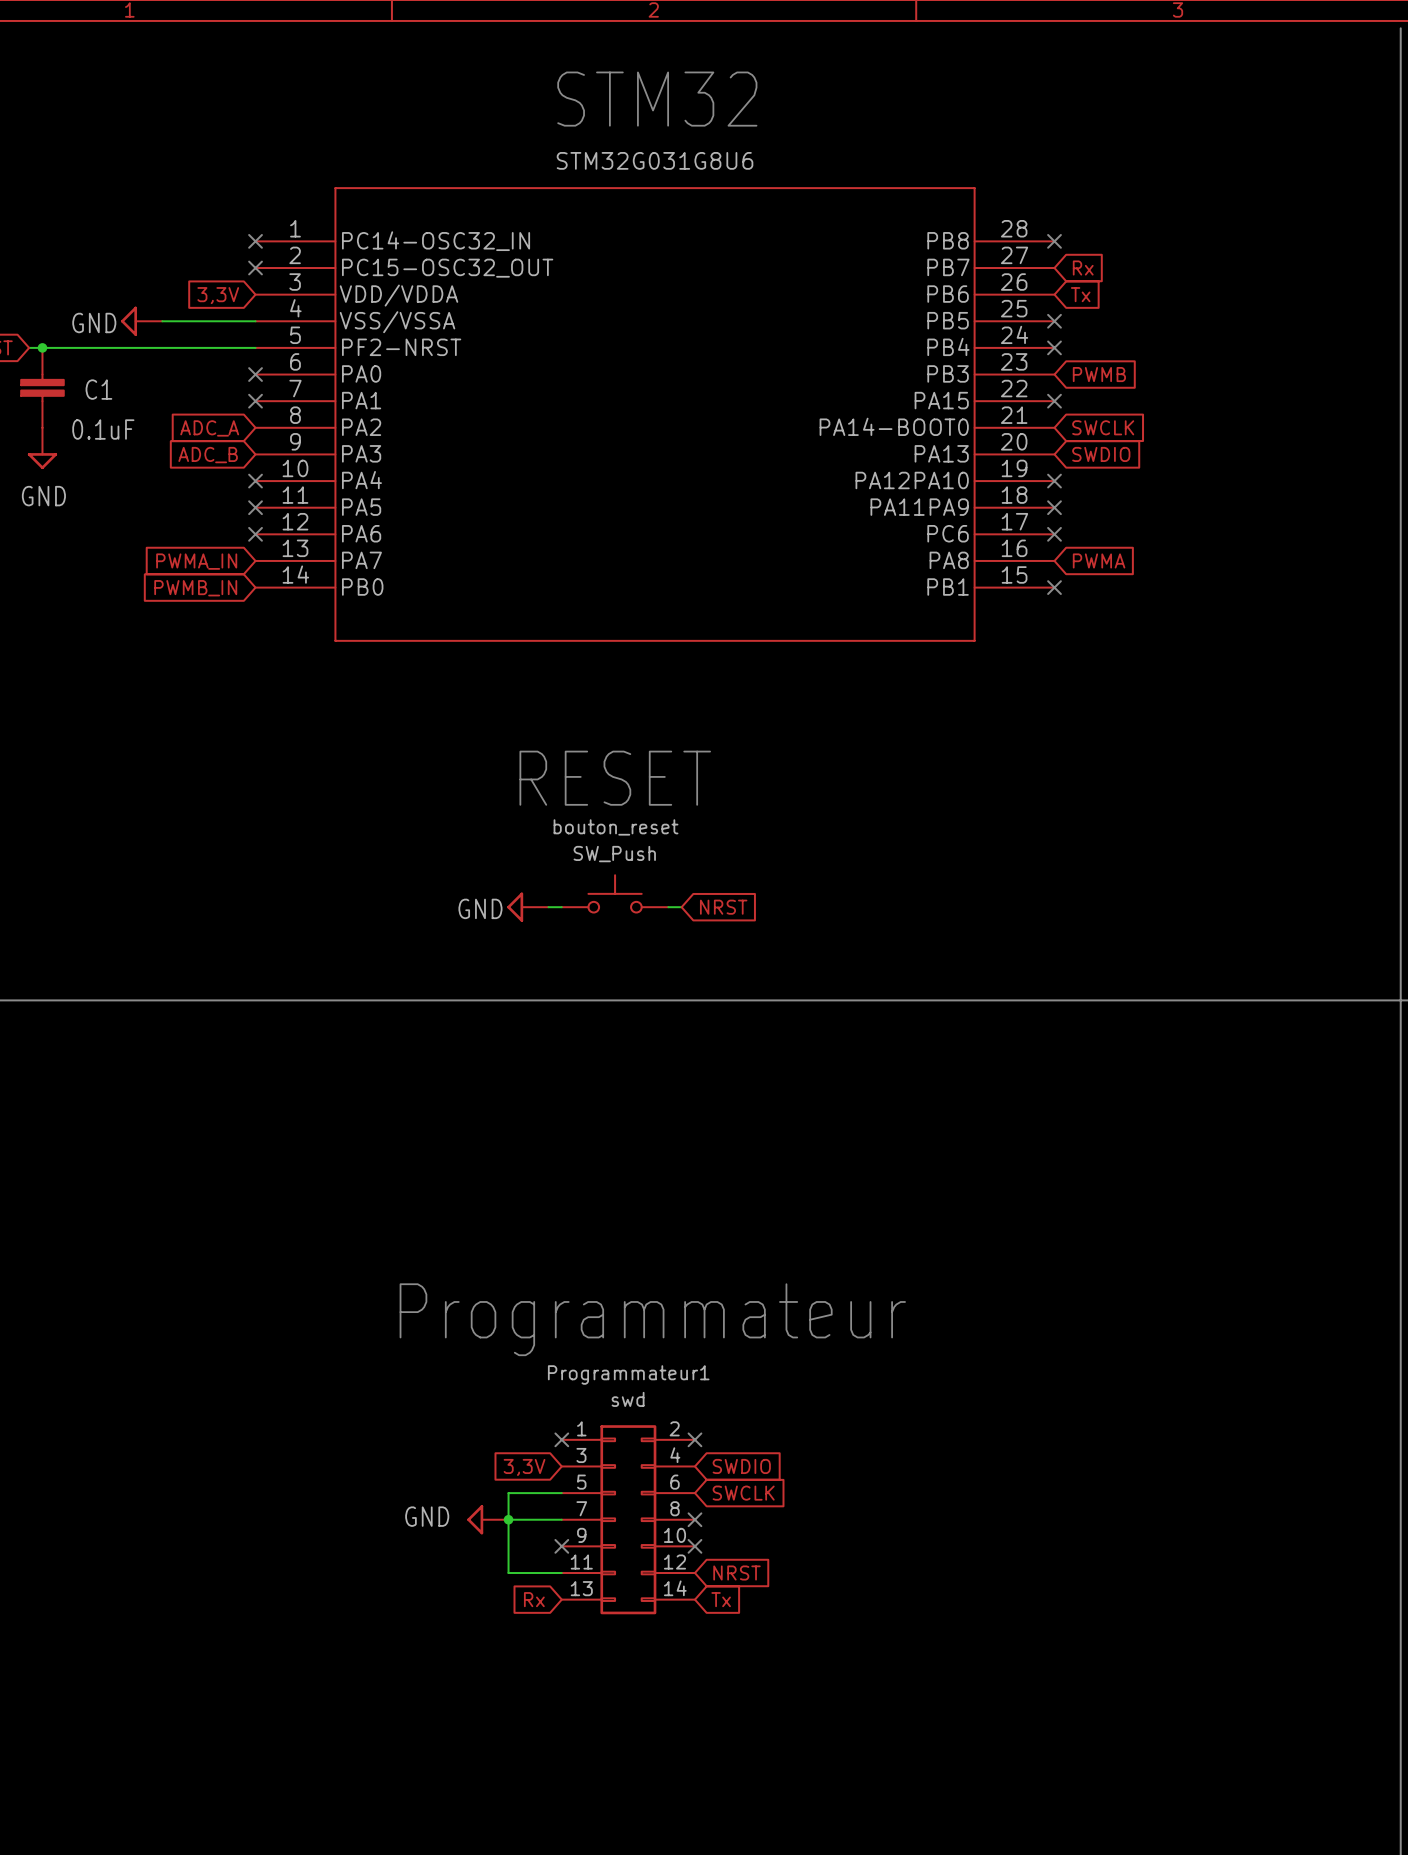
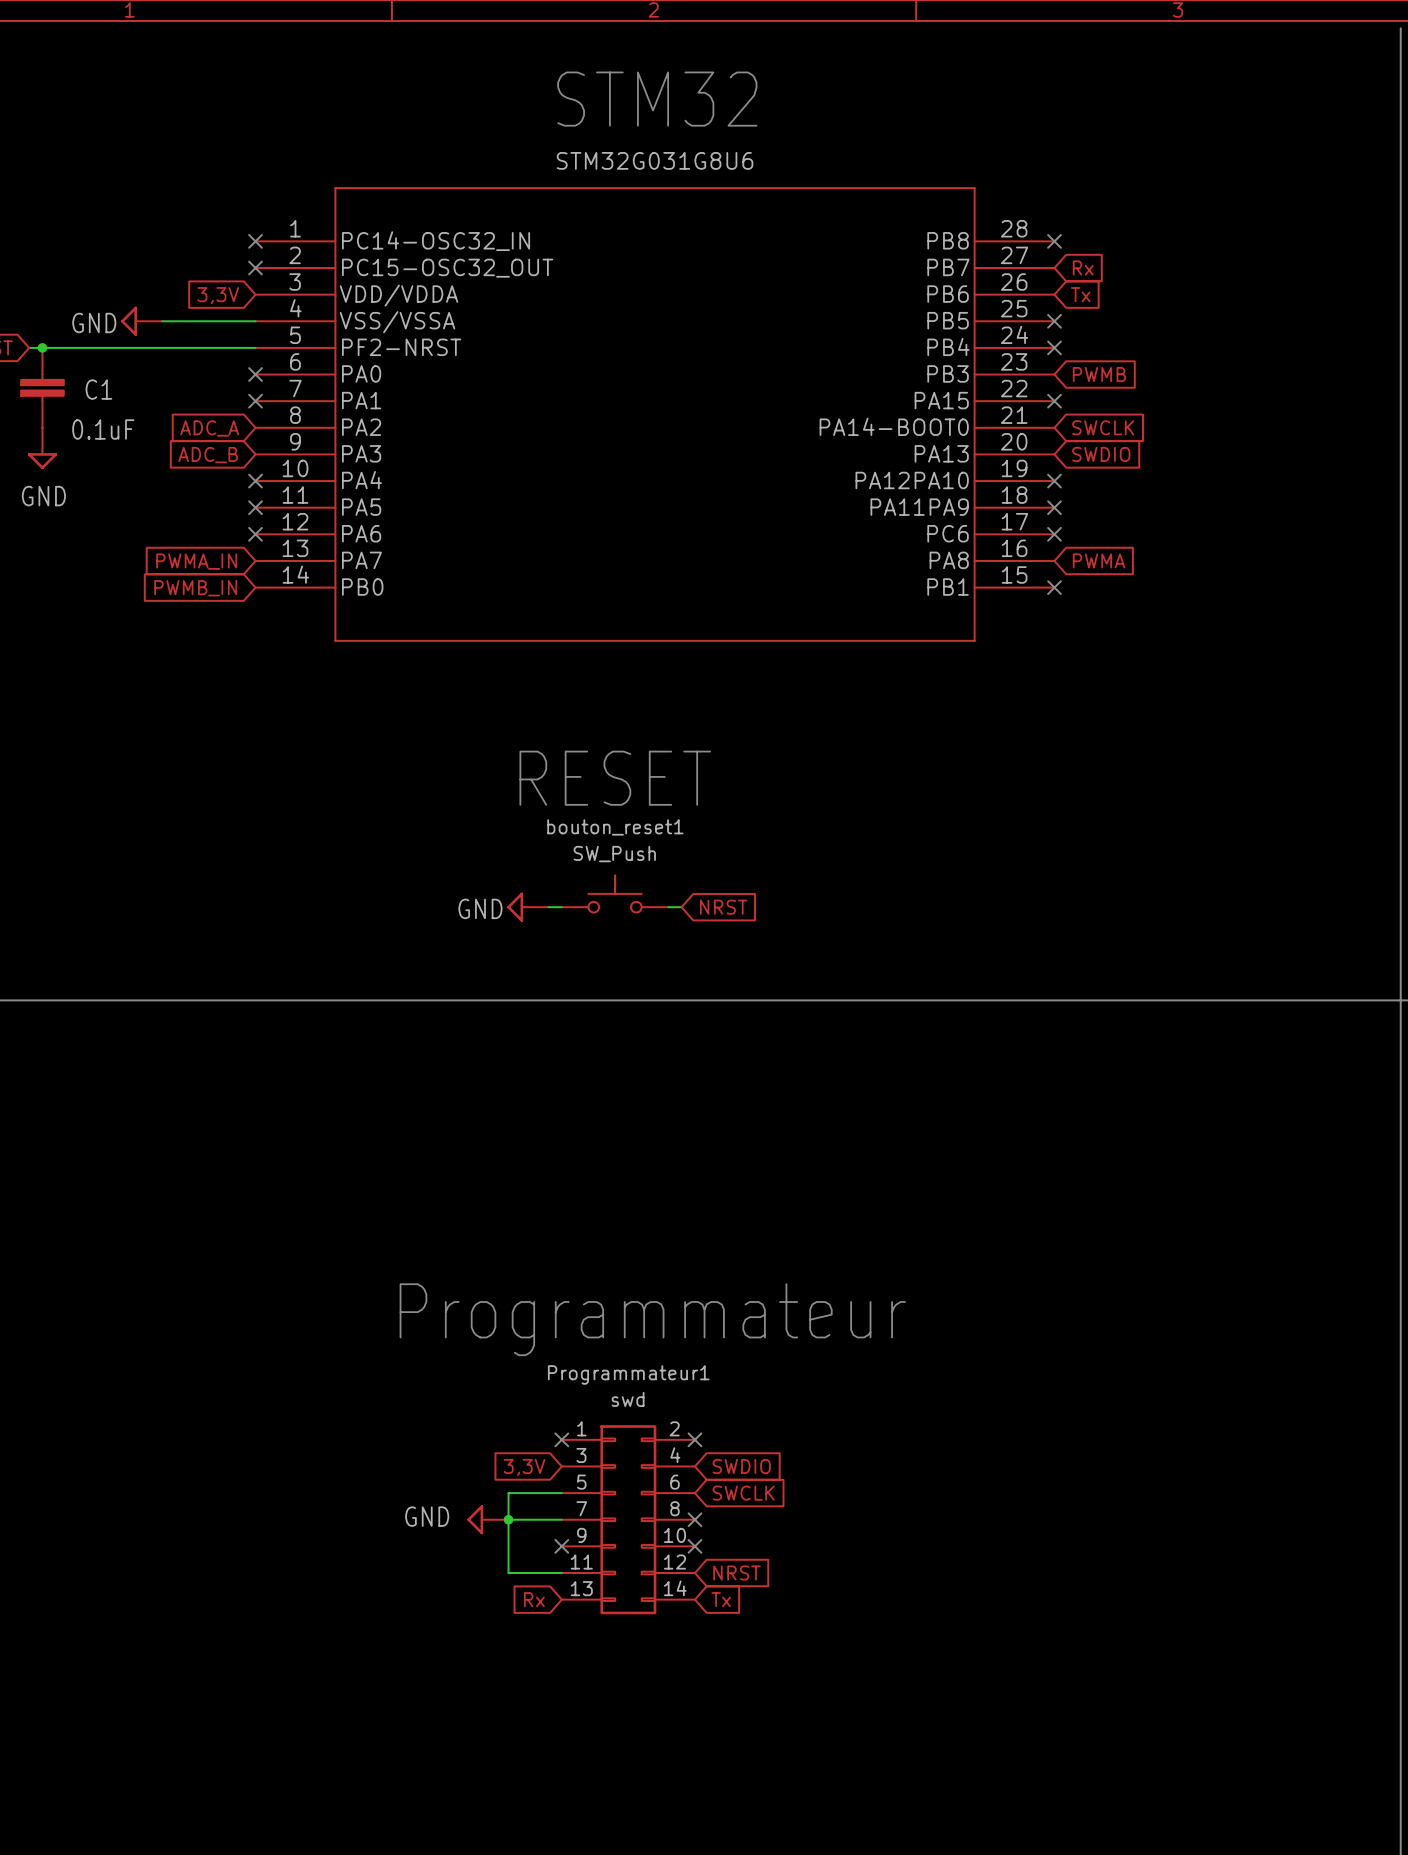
bouton_reset name: bouton_reset (616, 827) -> bouton_reset1 (615, 827)

